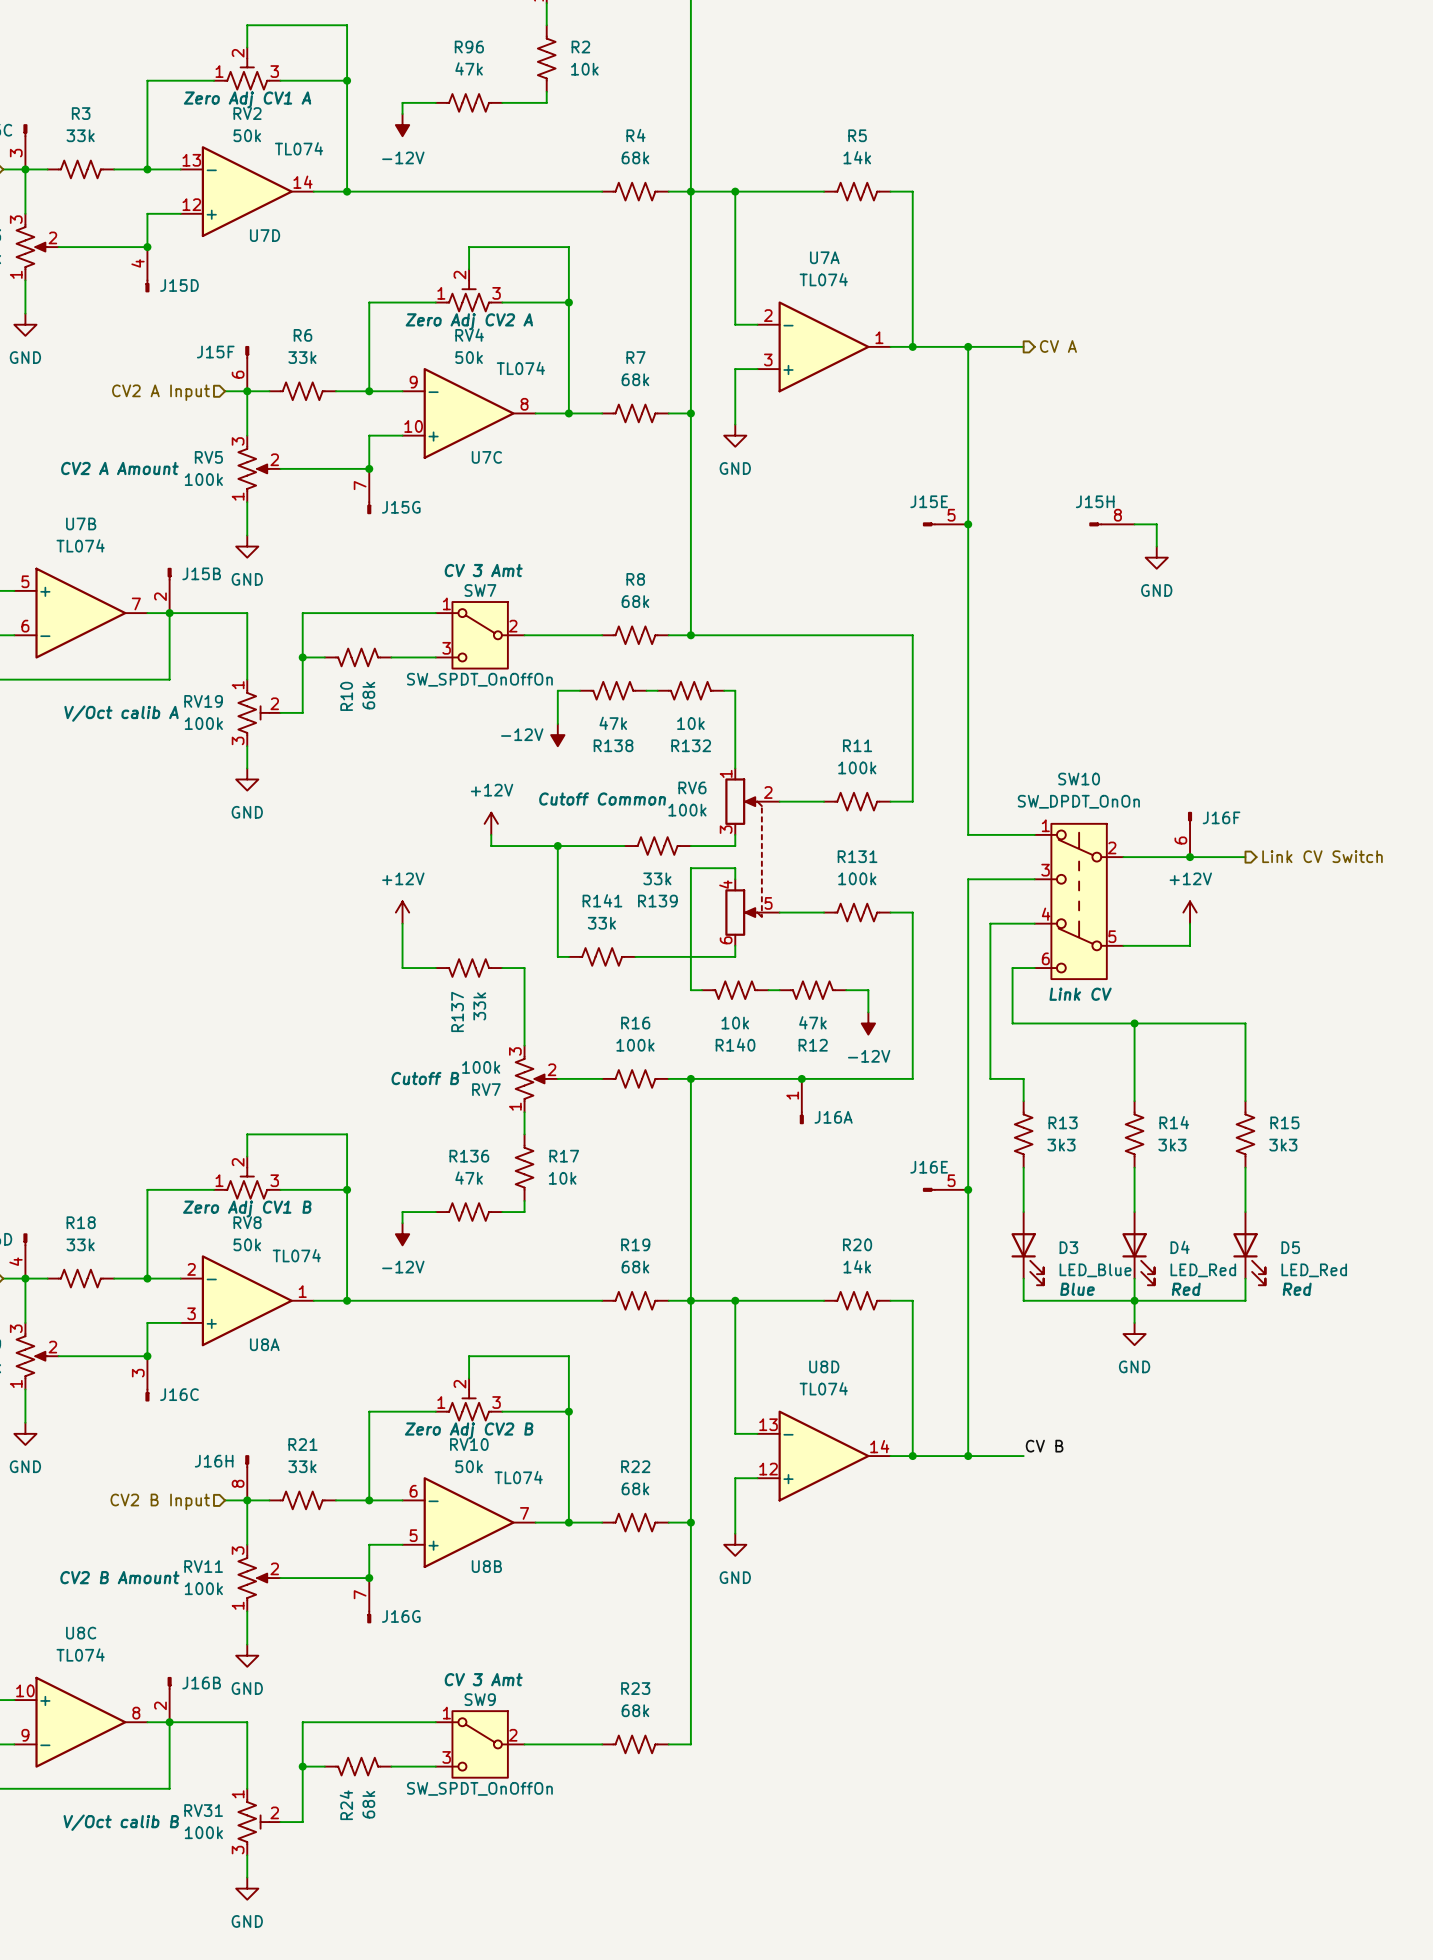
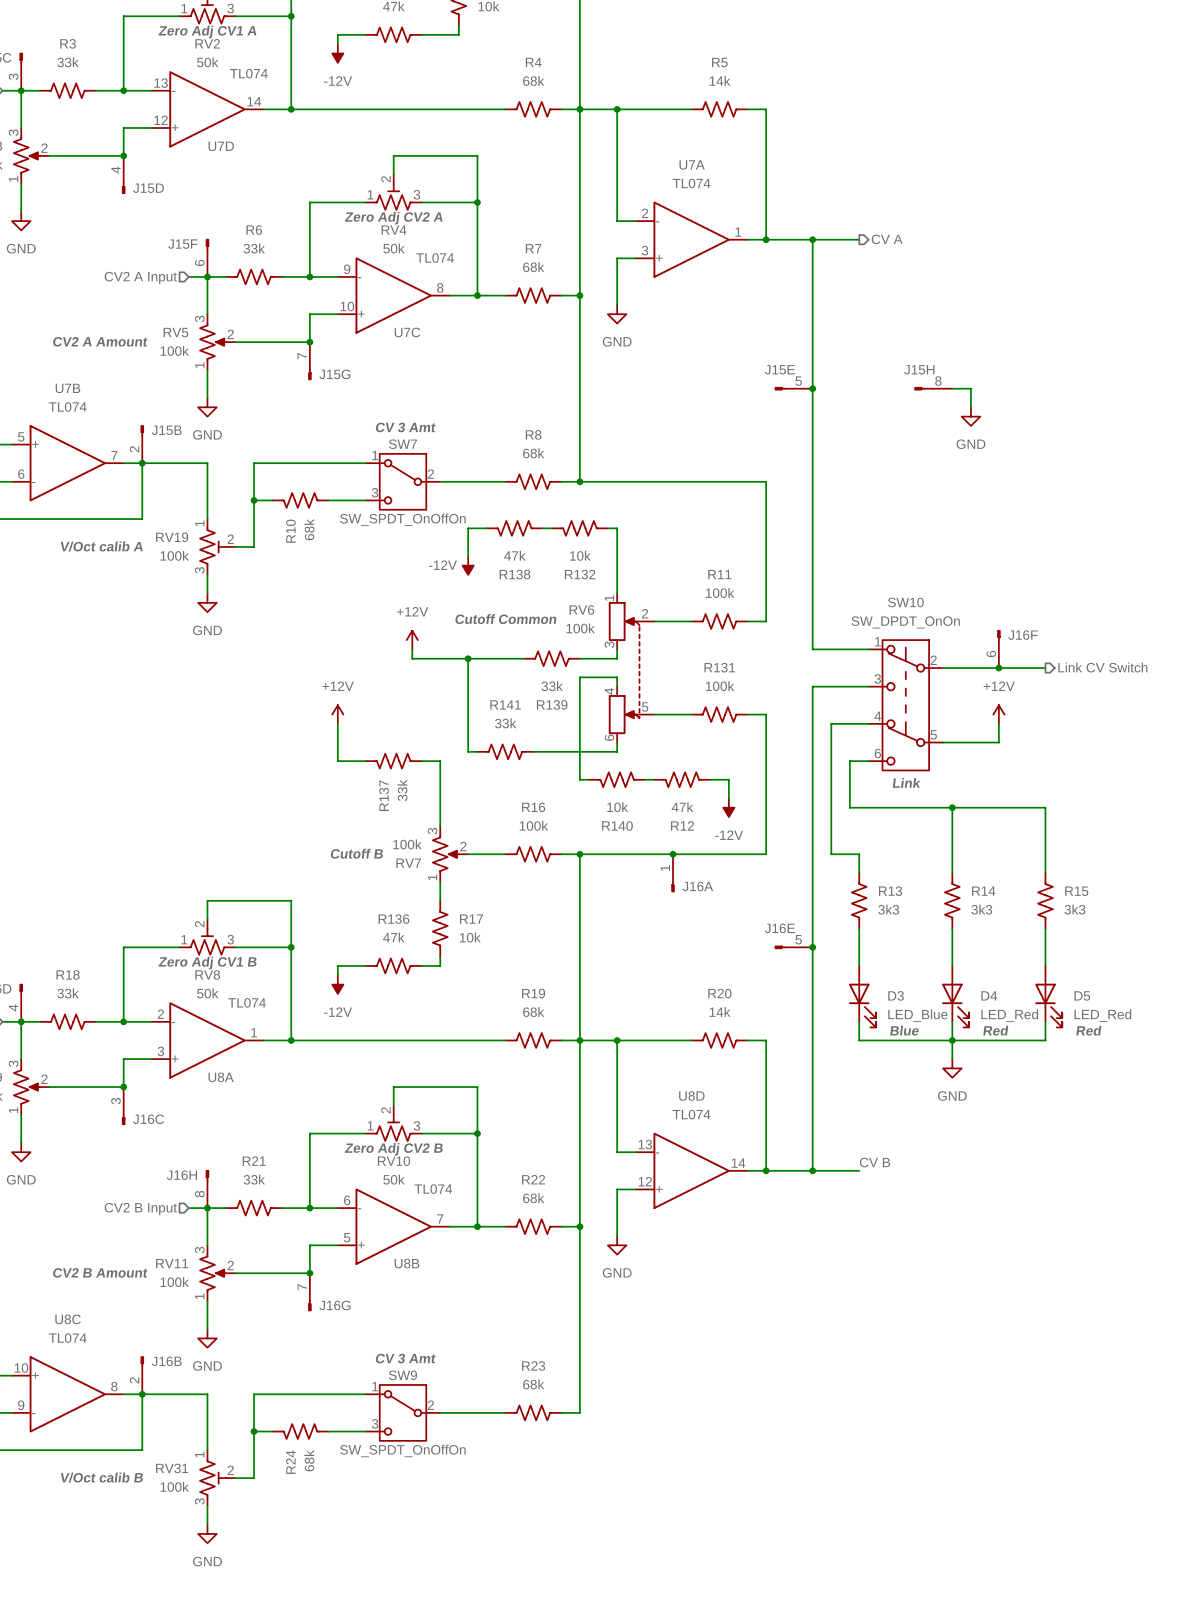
SW10 text: Link CV (1080, 994) -> Link (906, 782)

